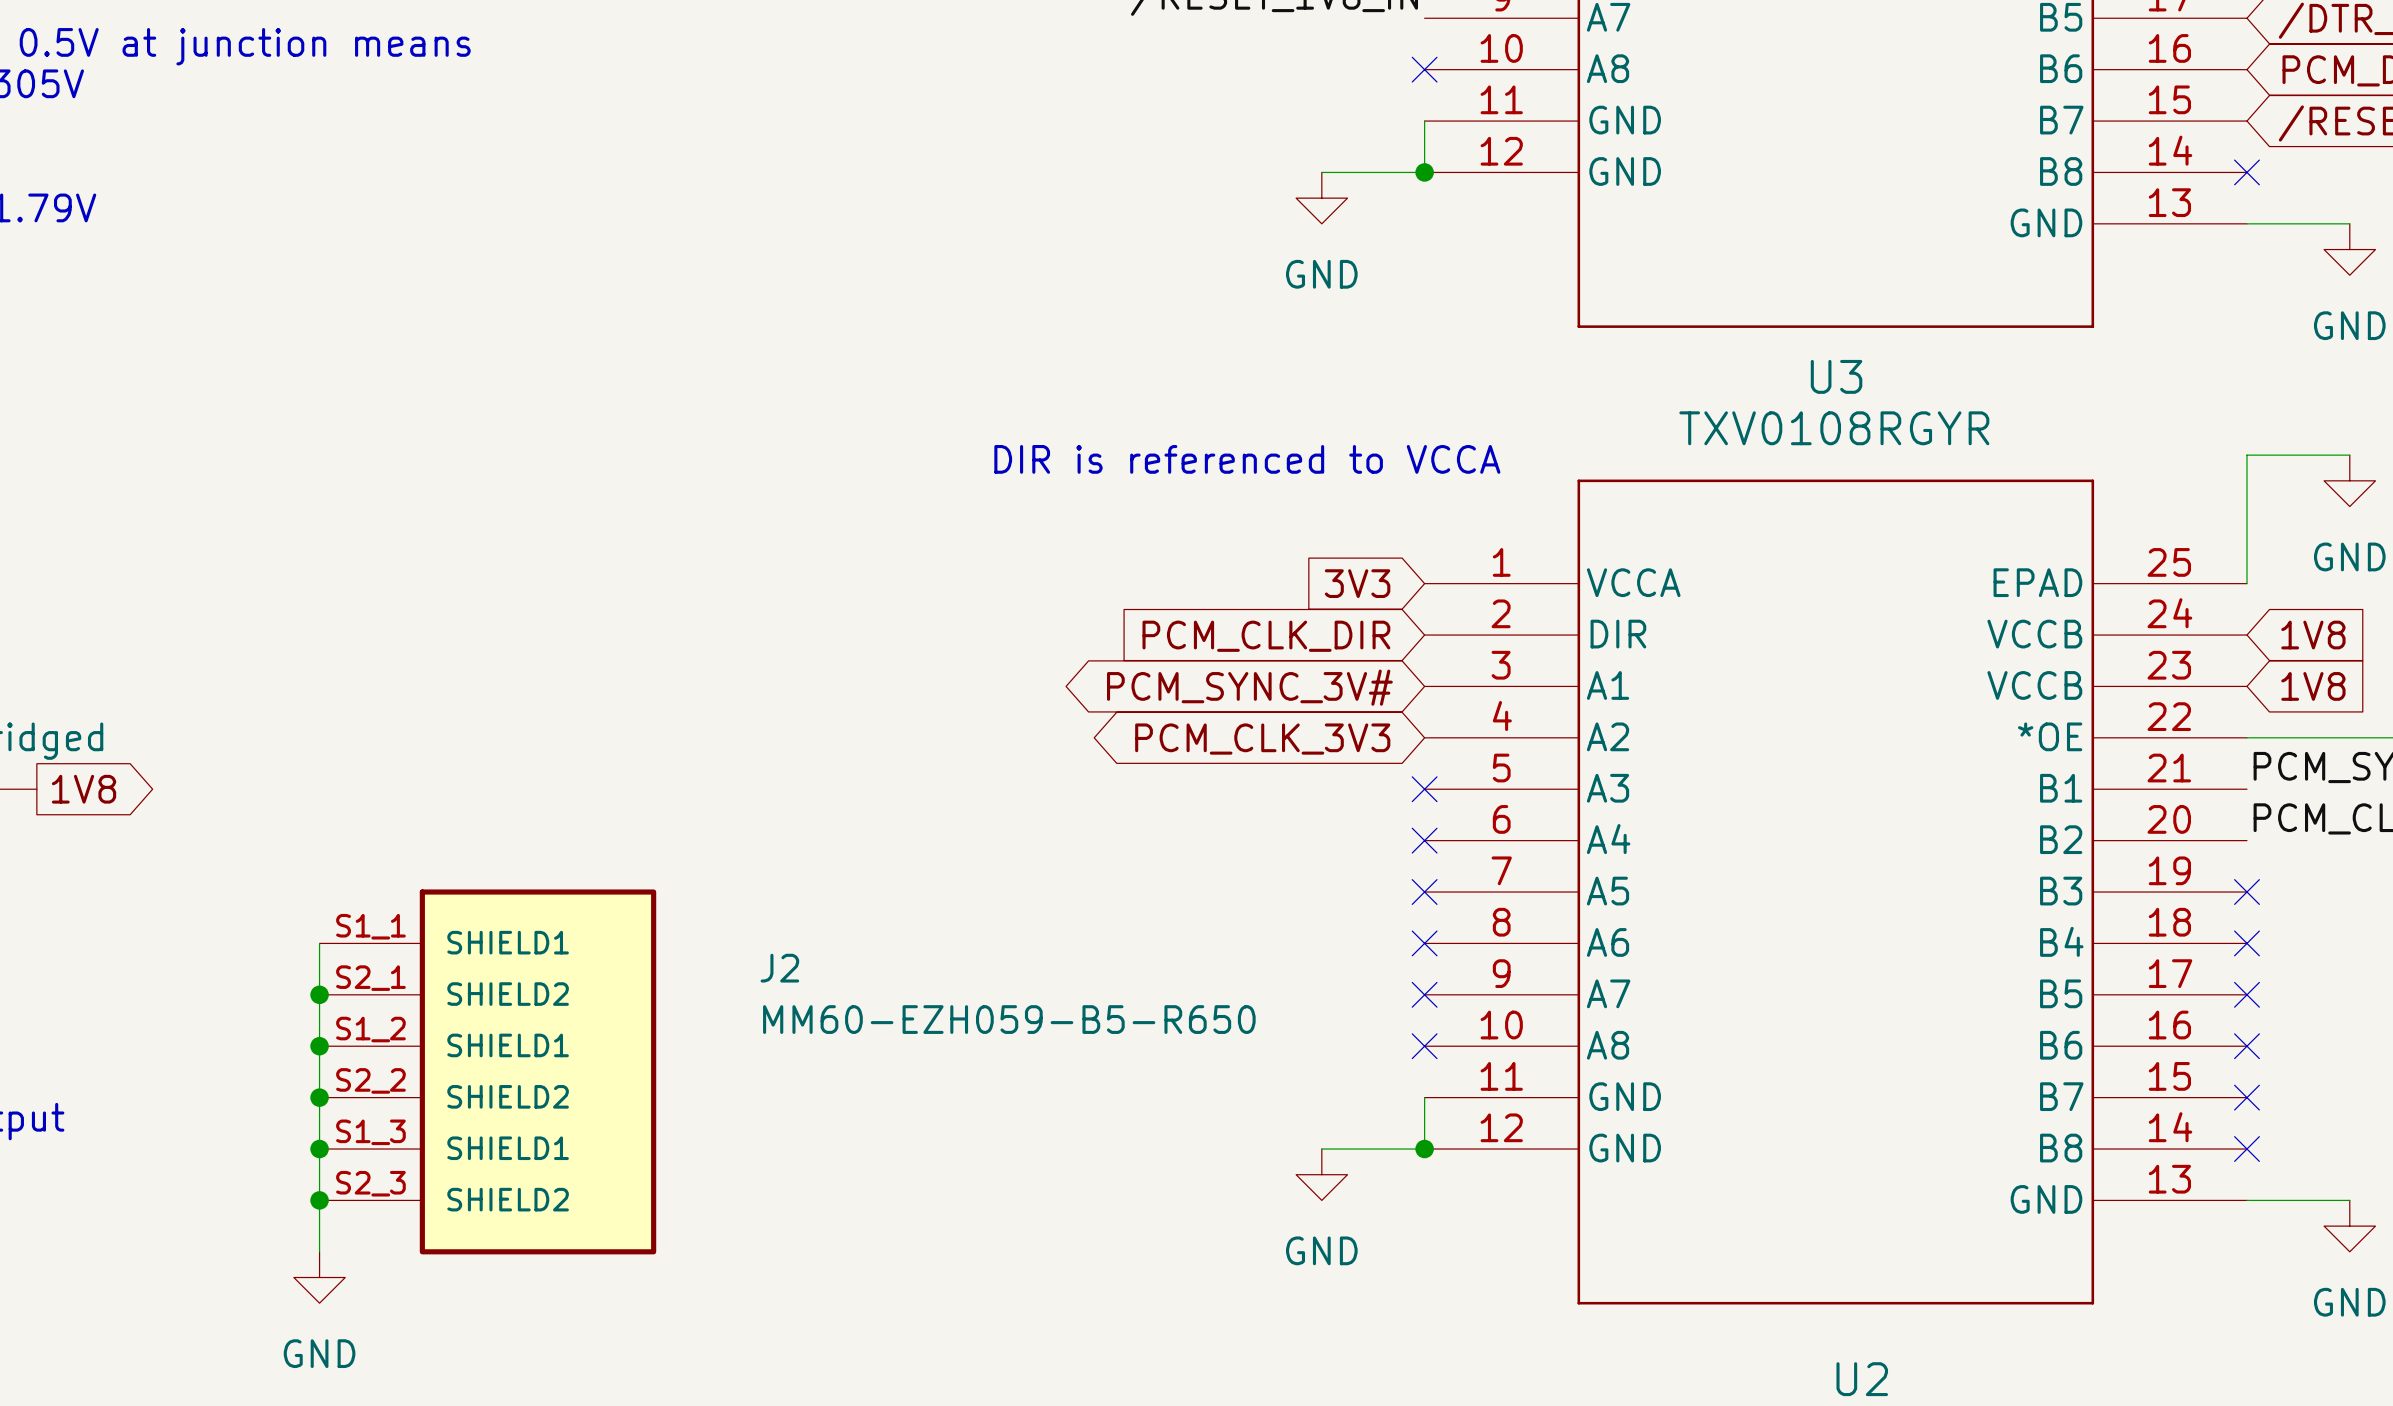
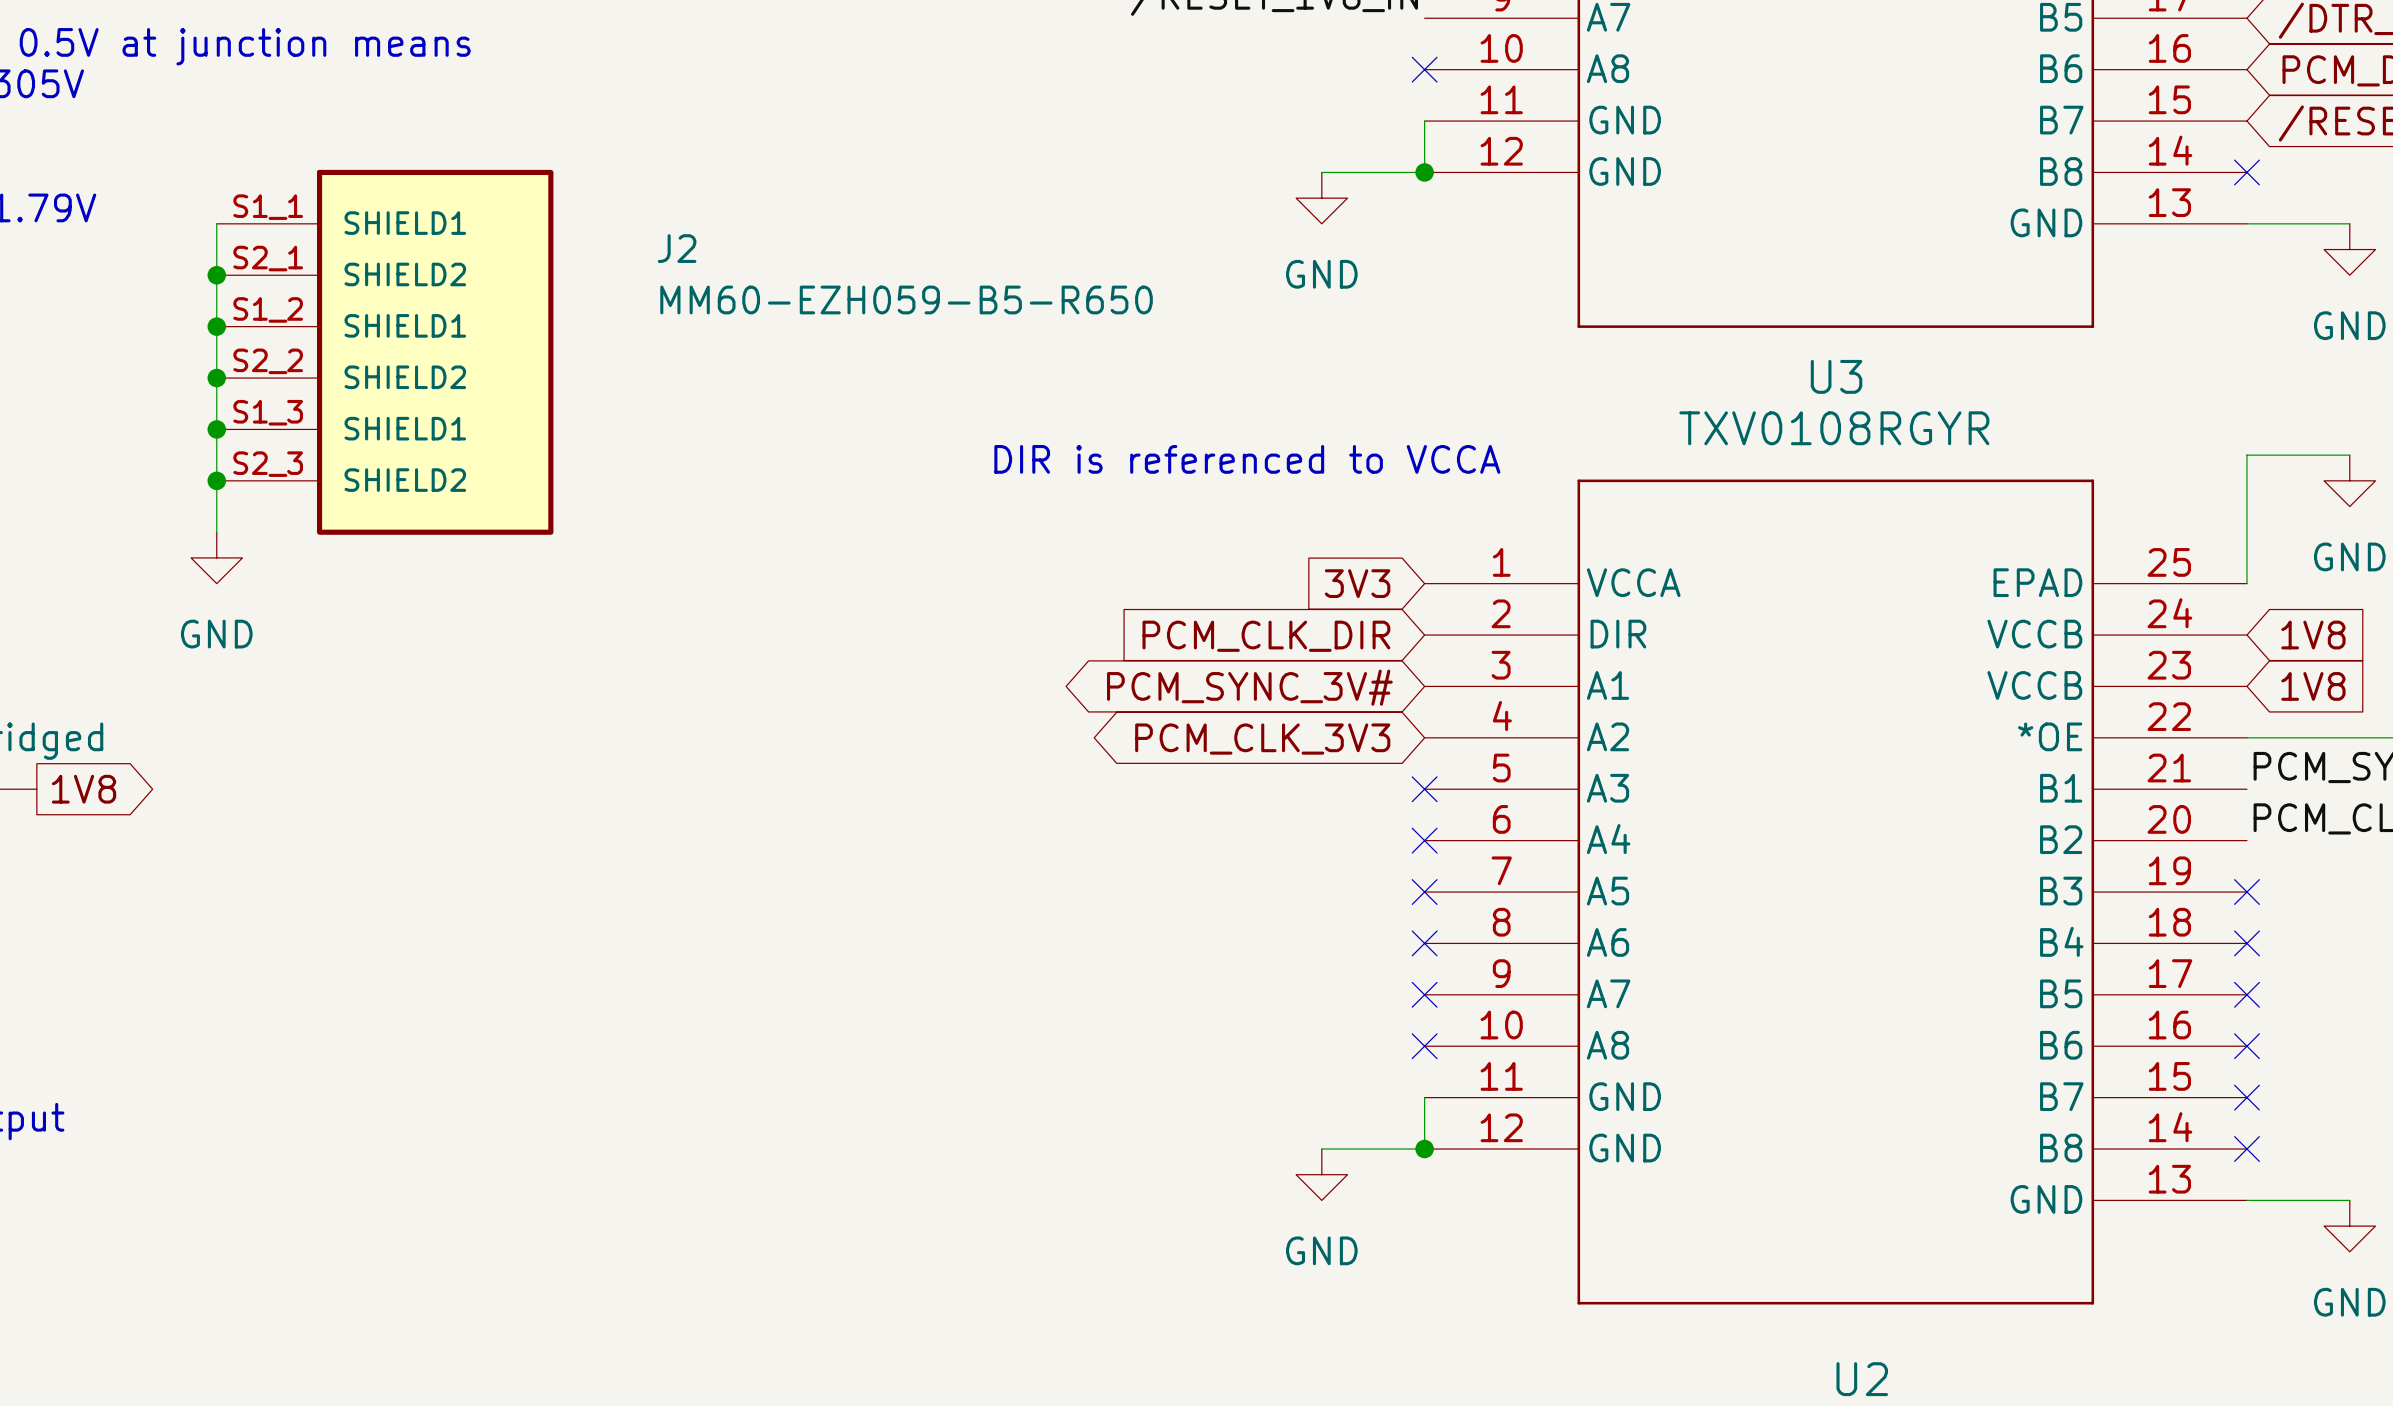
wire: none -> (216, 223) (216, 532)
junction: none -> (216, 275)
junction: none -> (216, 326)
junction: none -> (216, 378)
junction: none -> (216, 429)
junction: none -> (216, 480)
power symbol: none -> GND (216, 557)
wire: (319, 943) (319, 1251) -> none
junction: (319, 994) -> none
junction: (319, 1046) -> none
J2 position: (487, 1071) -> (385, 352)
junction: (319, 1097) -> none
junction: (319, 1149) -> none
junction: (319, 1200) -> none
power symbol: GND (319, 1277) -> none

